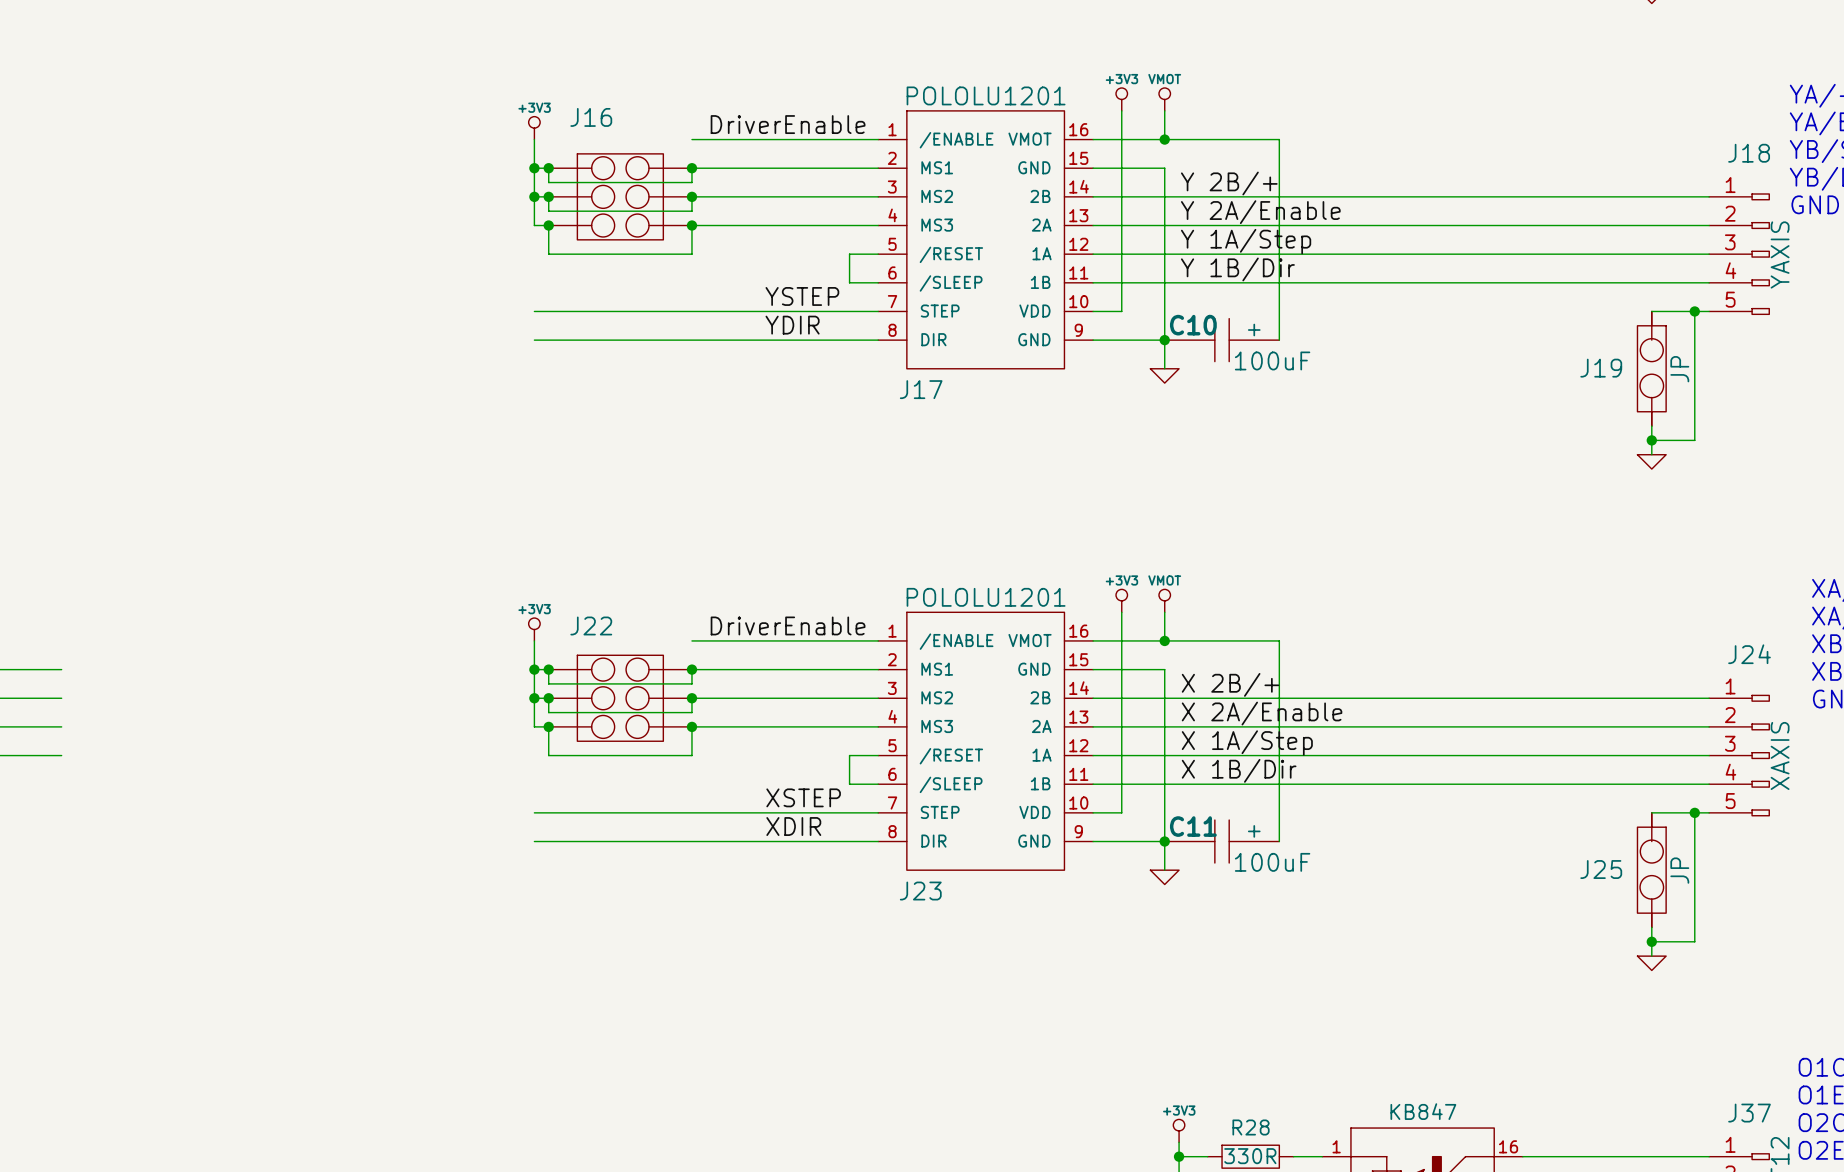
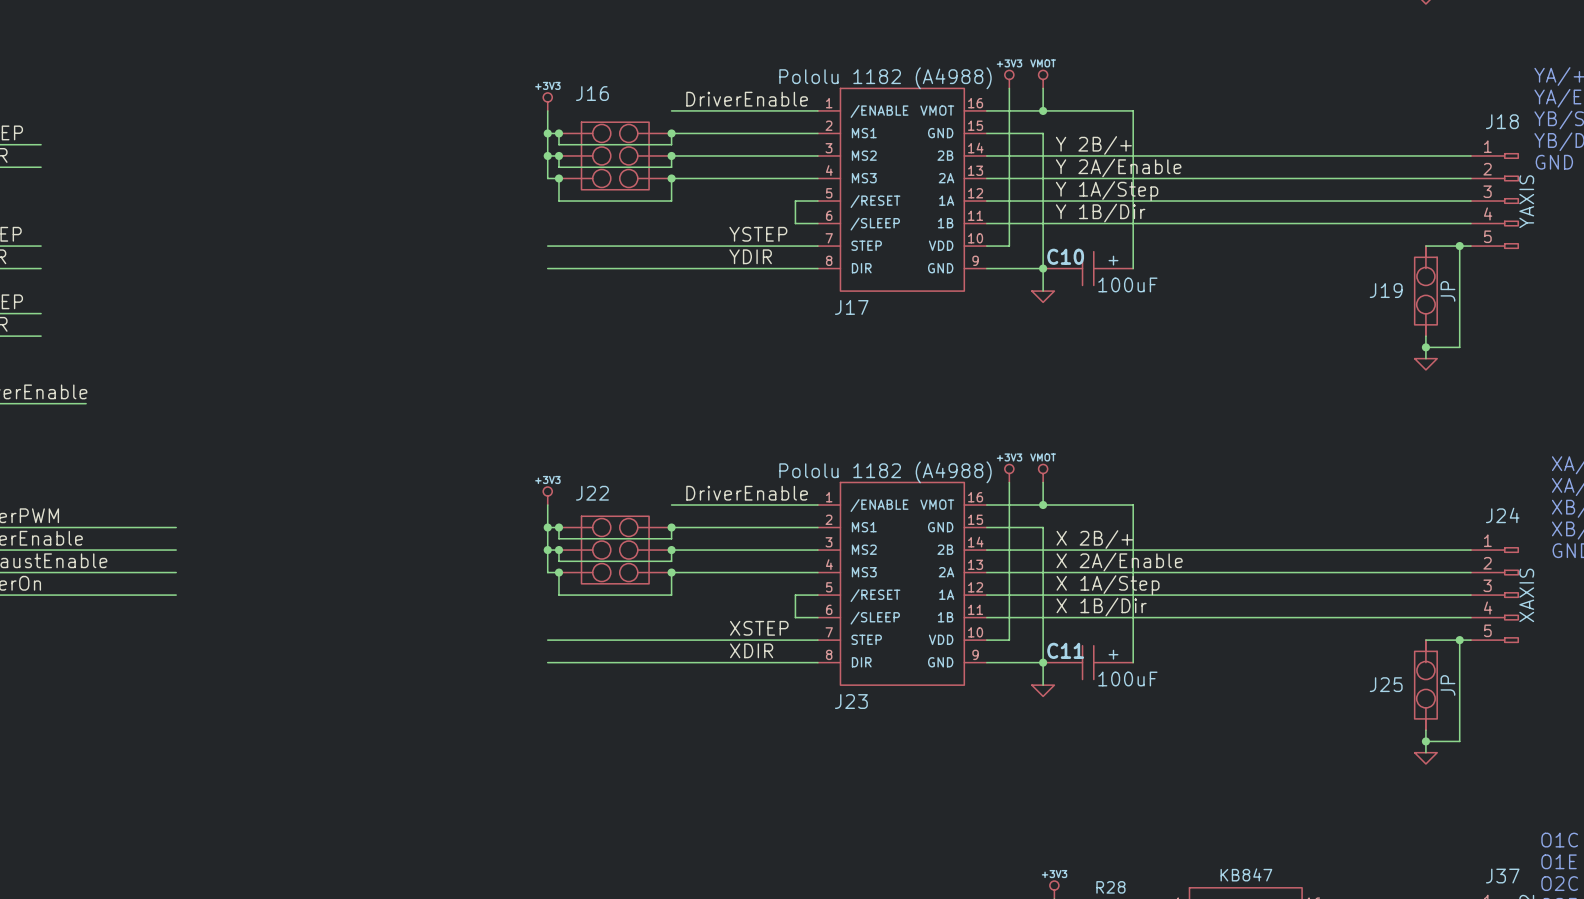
J17 value: POLOLU1201 (986, 95) -> Pololu 1182 (A4988) (885, 78)
J23 value: POLOLU1201 (986, 597) -> Pololu 1182 (A4988) (885, 472)

